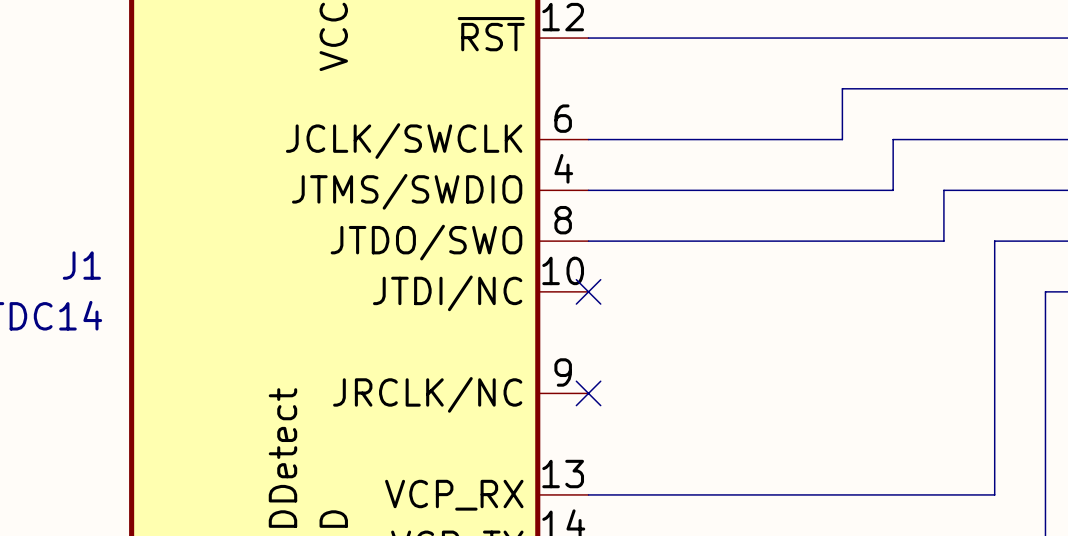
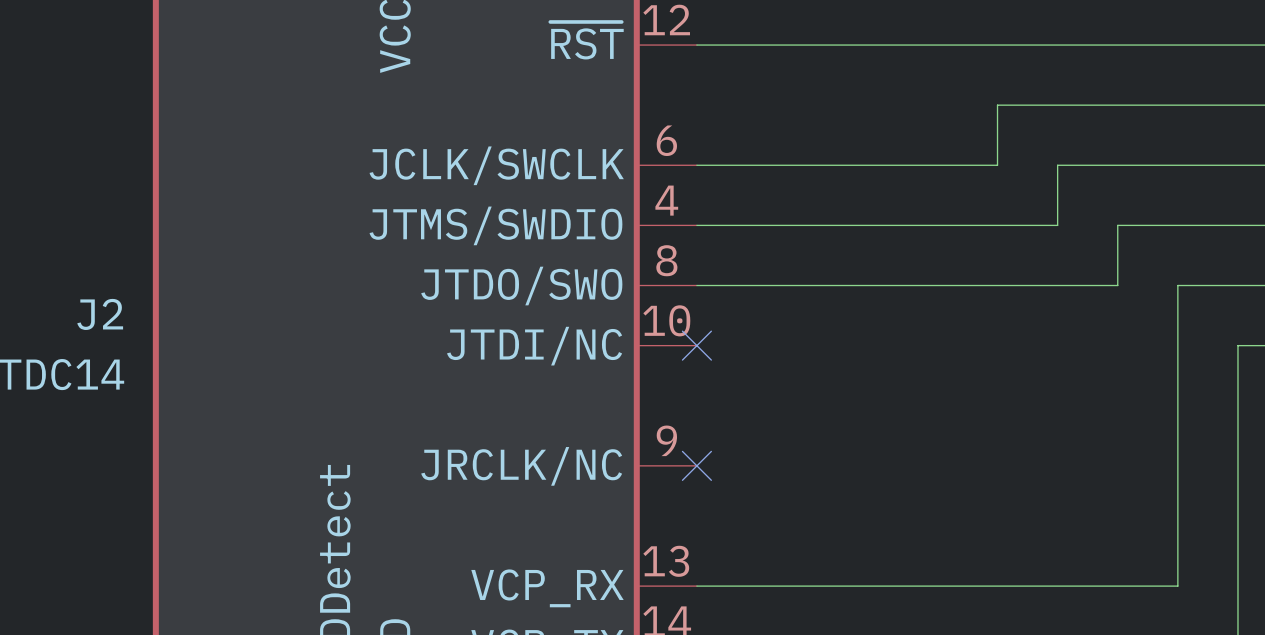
J1 name: J1 (81, 265) -> J2 (100, 314)

